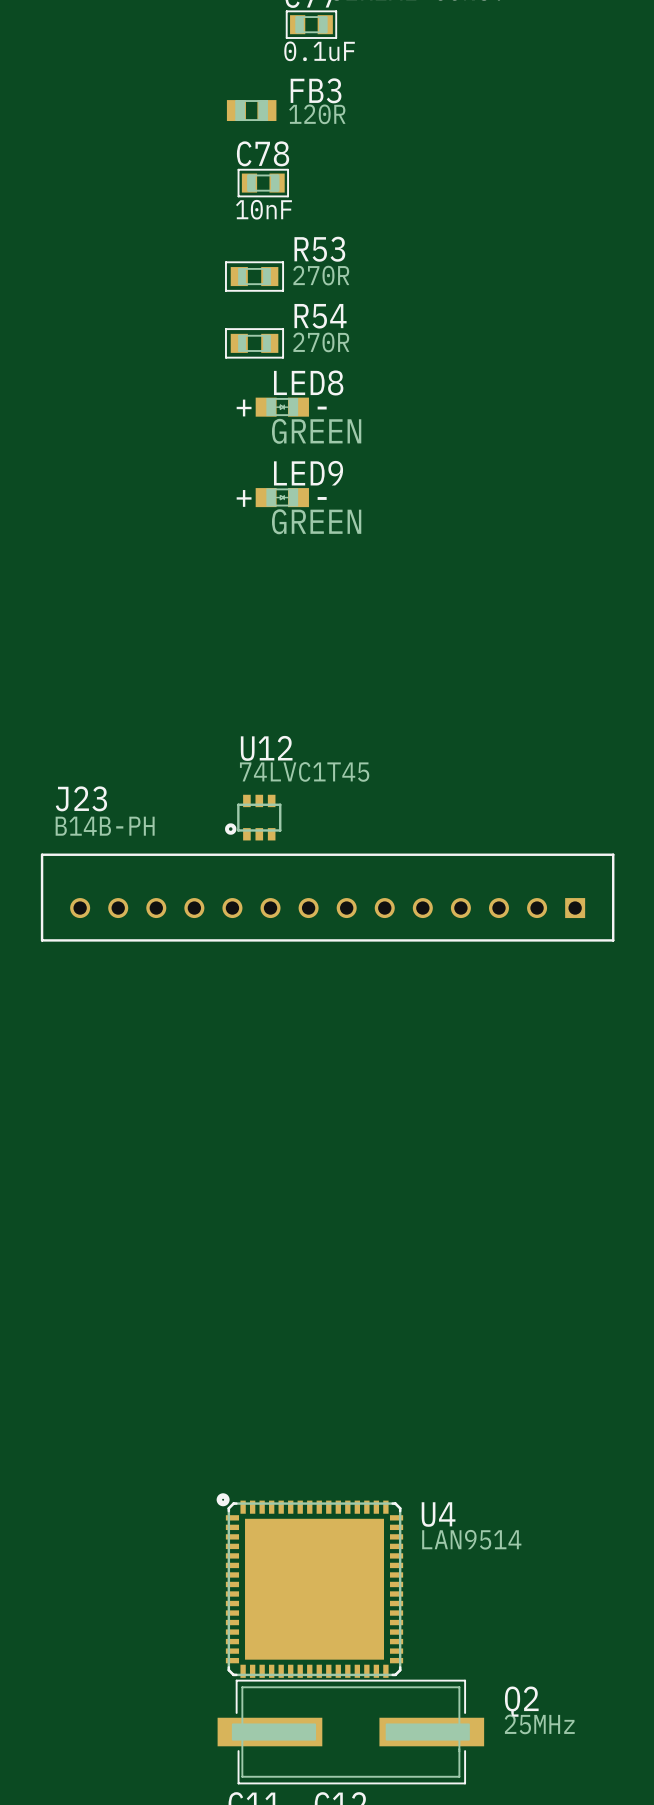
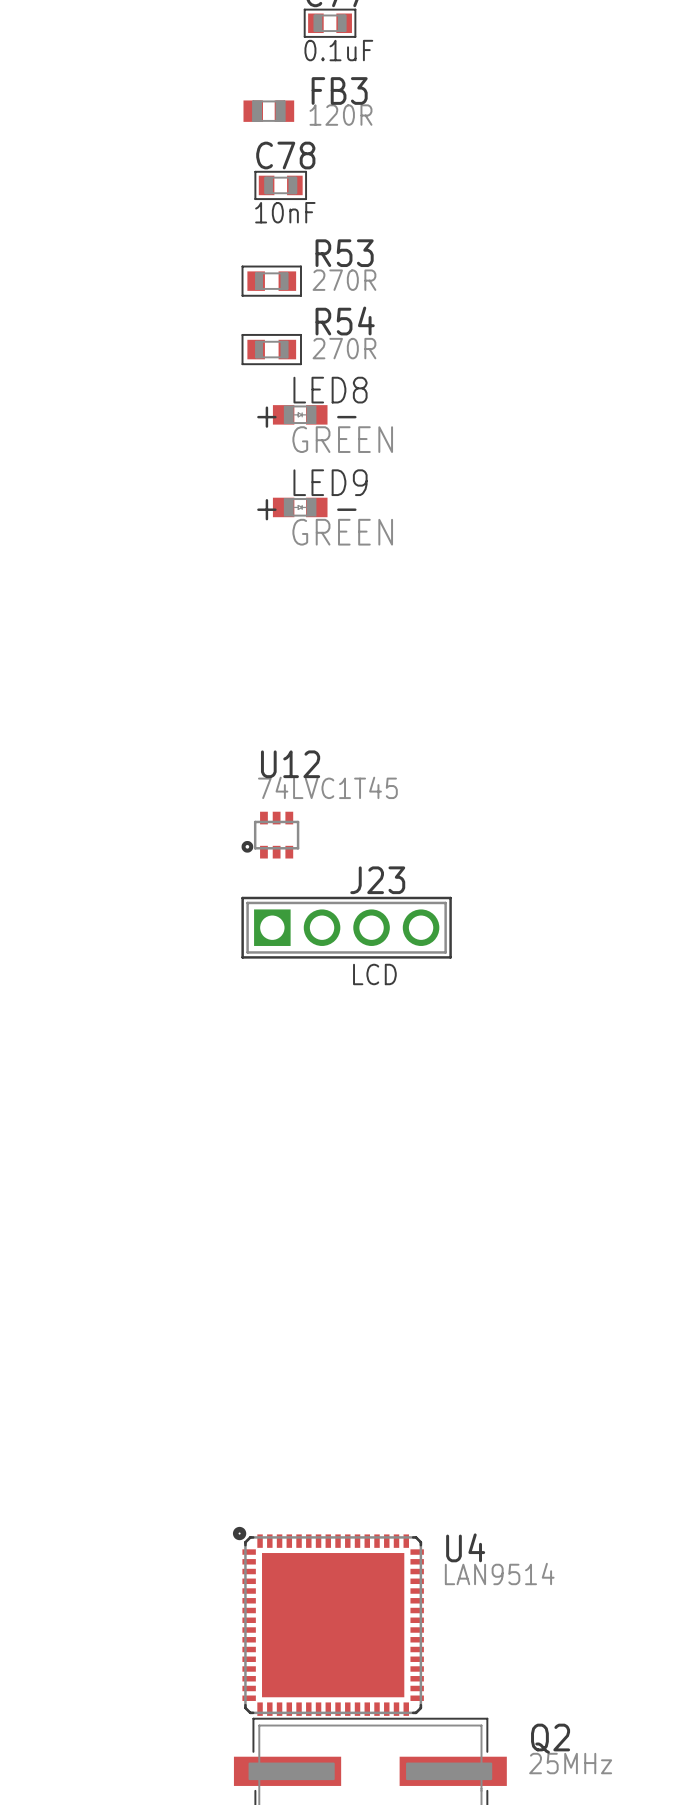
J23 name position: J23 (81, 798) -> J23 (377, 880)
J23 value: B14B-PH (105, 826) -> LCD (374, 974)
J23 footprint: [40, 853, 615, 942] -> [241, 896, 452, 959]

